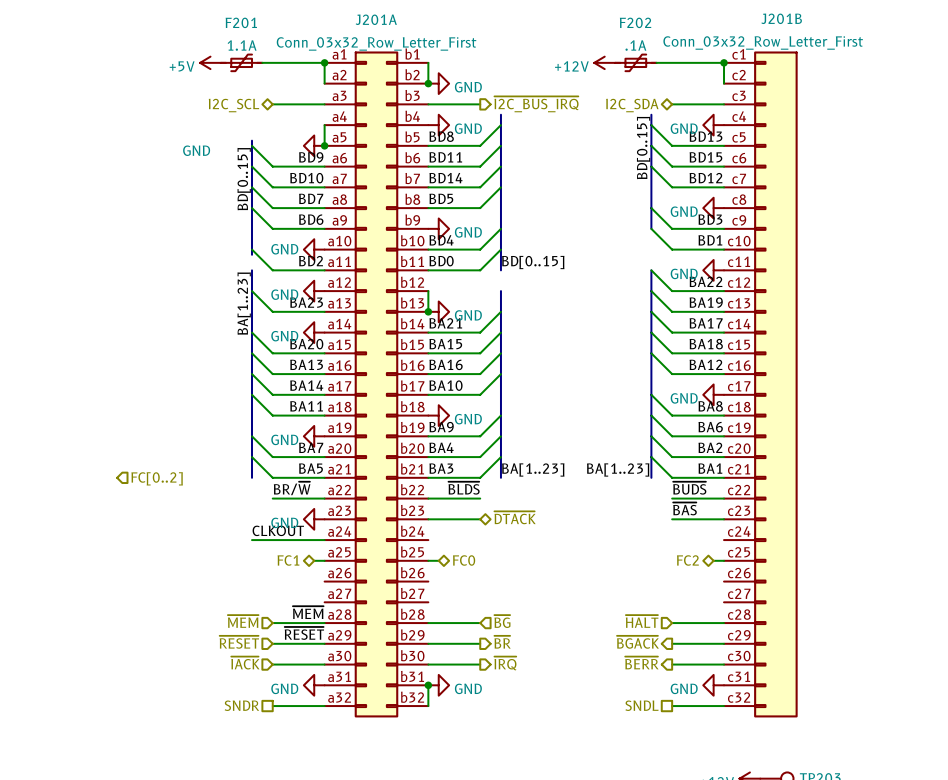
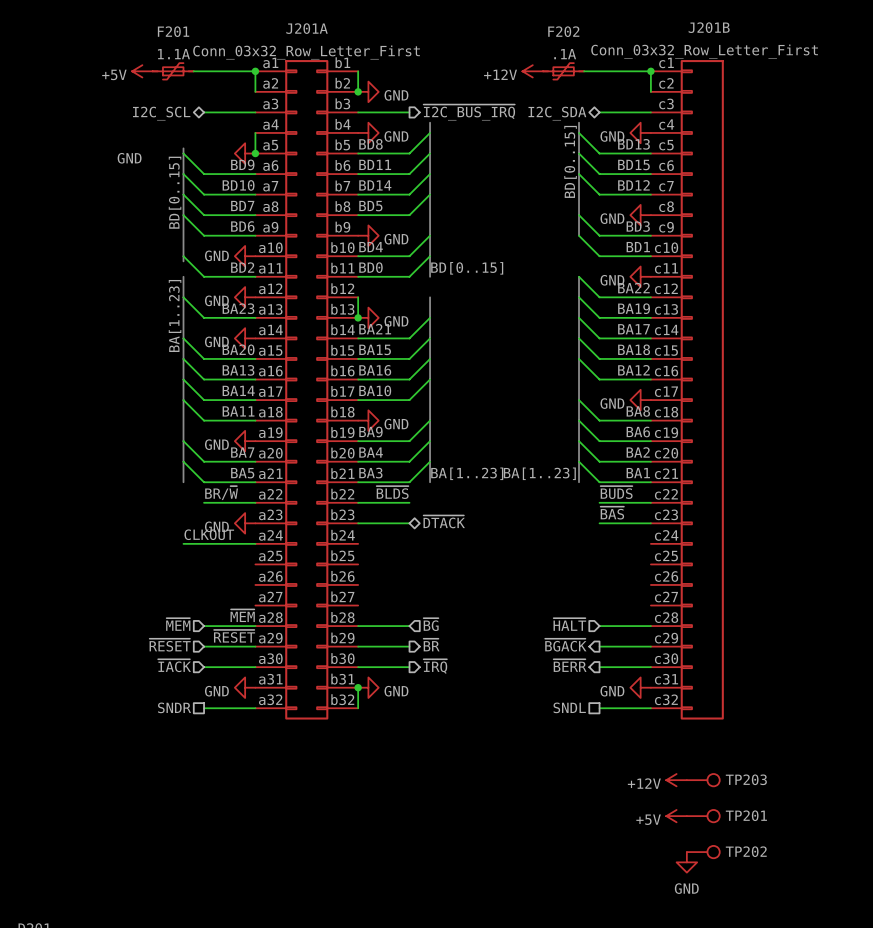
hierarchical label: FC[0..2] (157, 478) -> none
hierarchical label: FC1 (288, 560) -> none
wire: (314, 560) (324, 560) -> none
wire: (428, 560) (438, 560) -> none
hierarchical label: FC0 (464, 560) -> none
hierarchical label: FC2 (687, 560) -> none
wire: (713, 560) (724, 560) -> none

